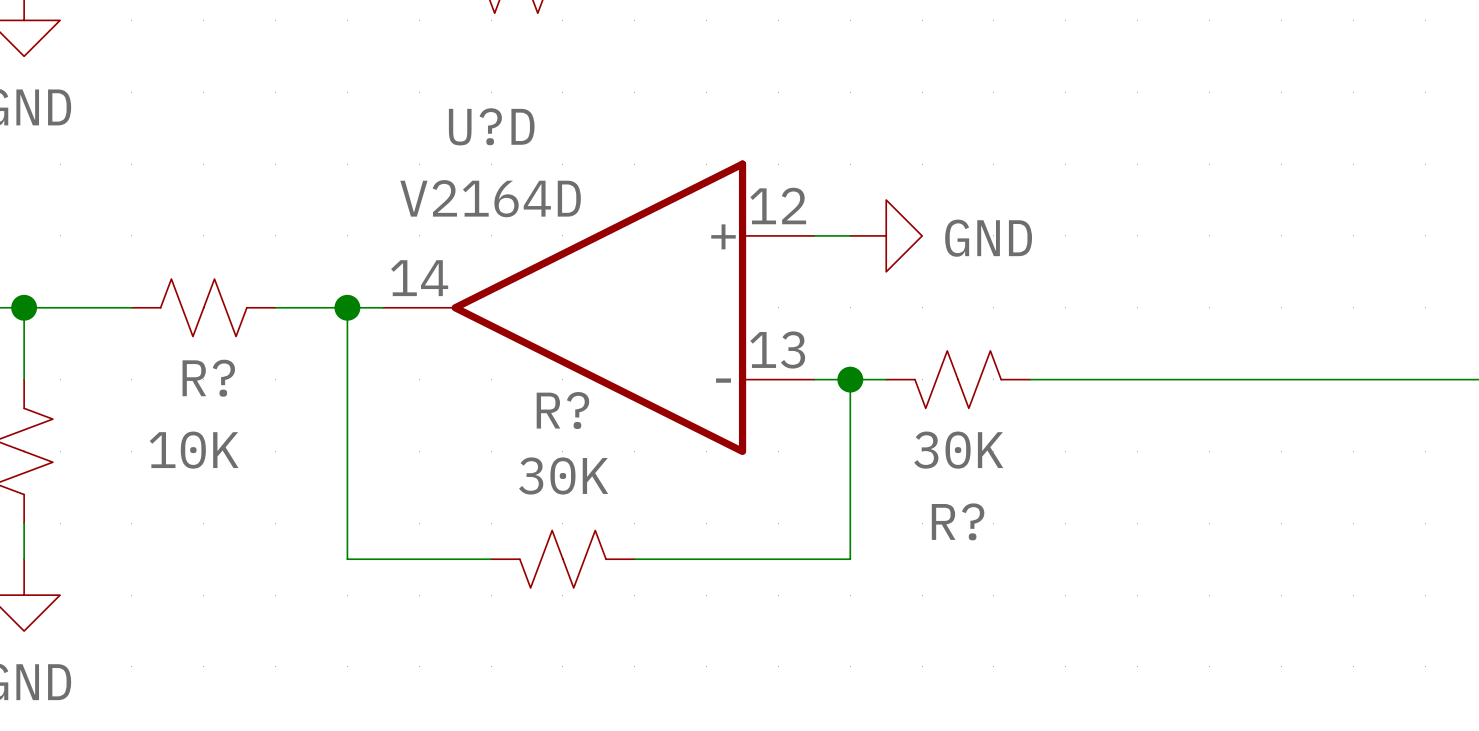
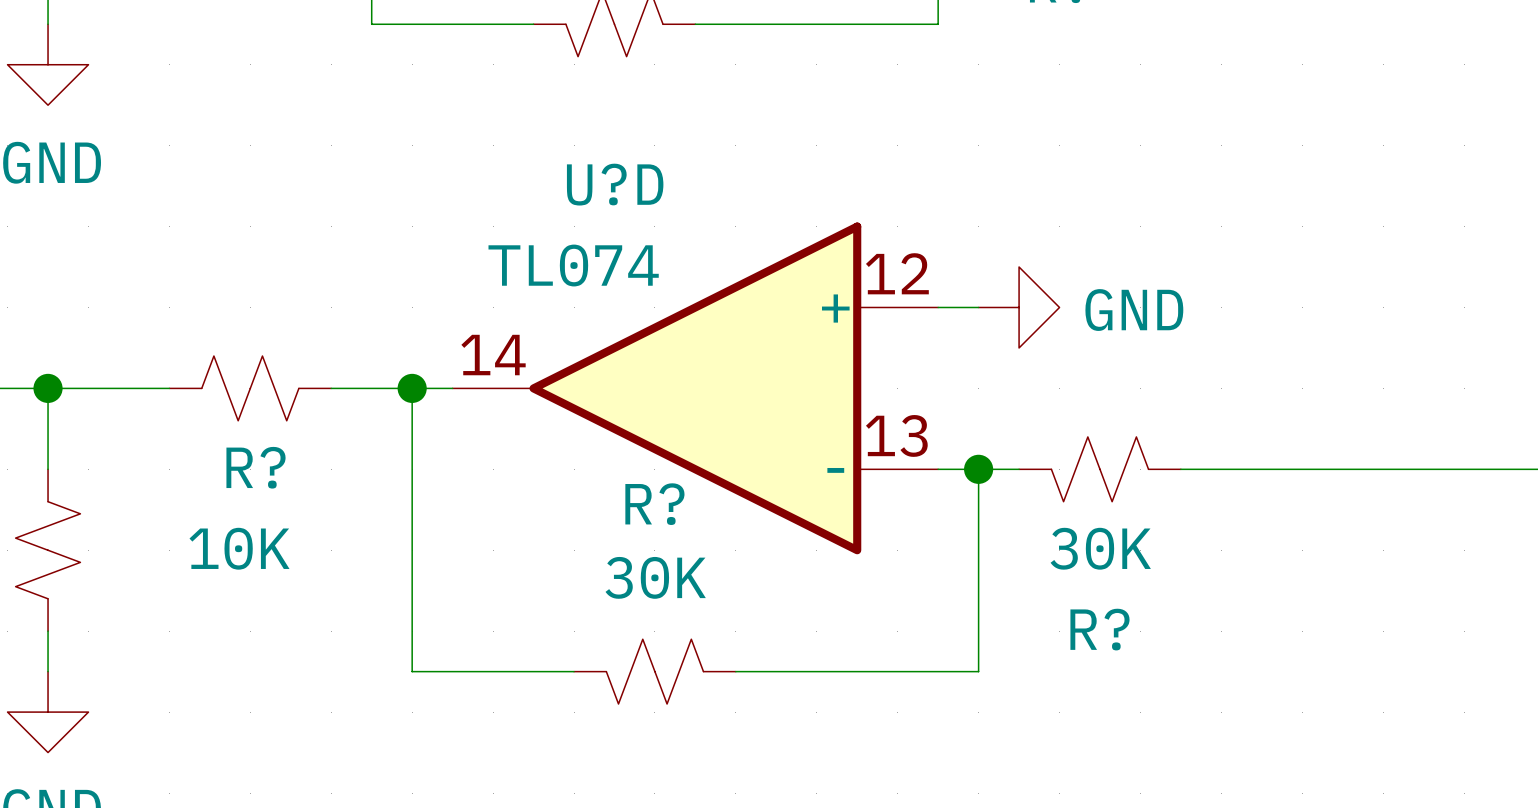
U?D name position: U?D (491, 126) -> U?D (615, 184)
U?D value: V2164D (490, 198) -> TL074 (573, 265)

